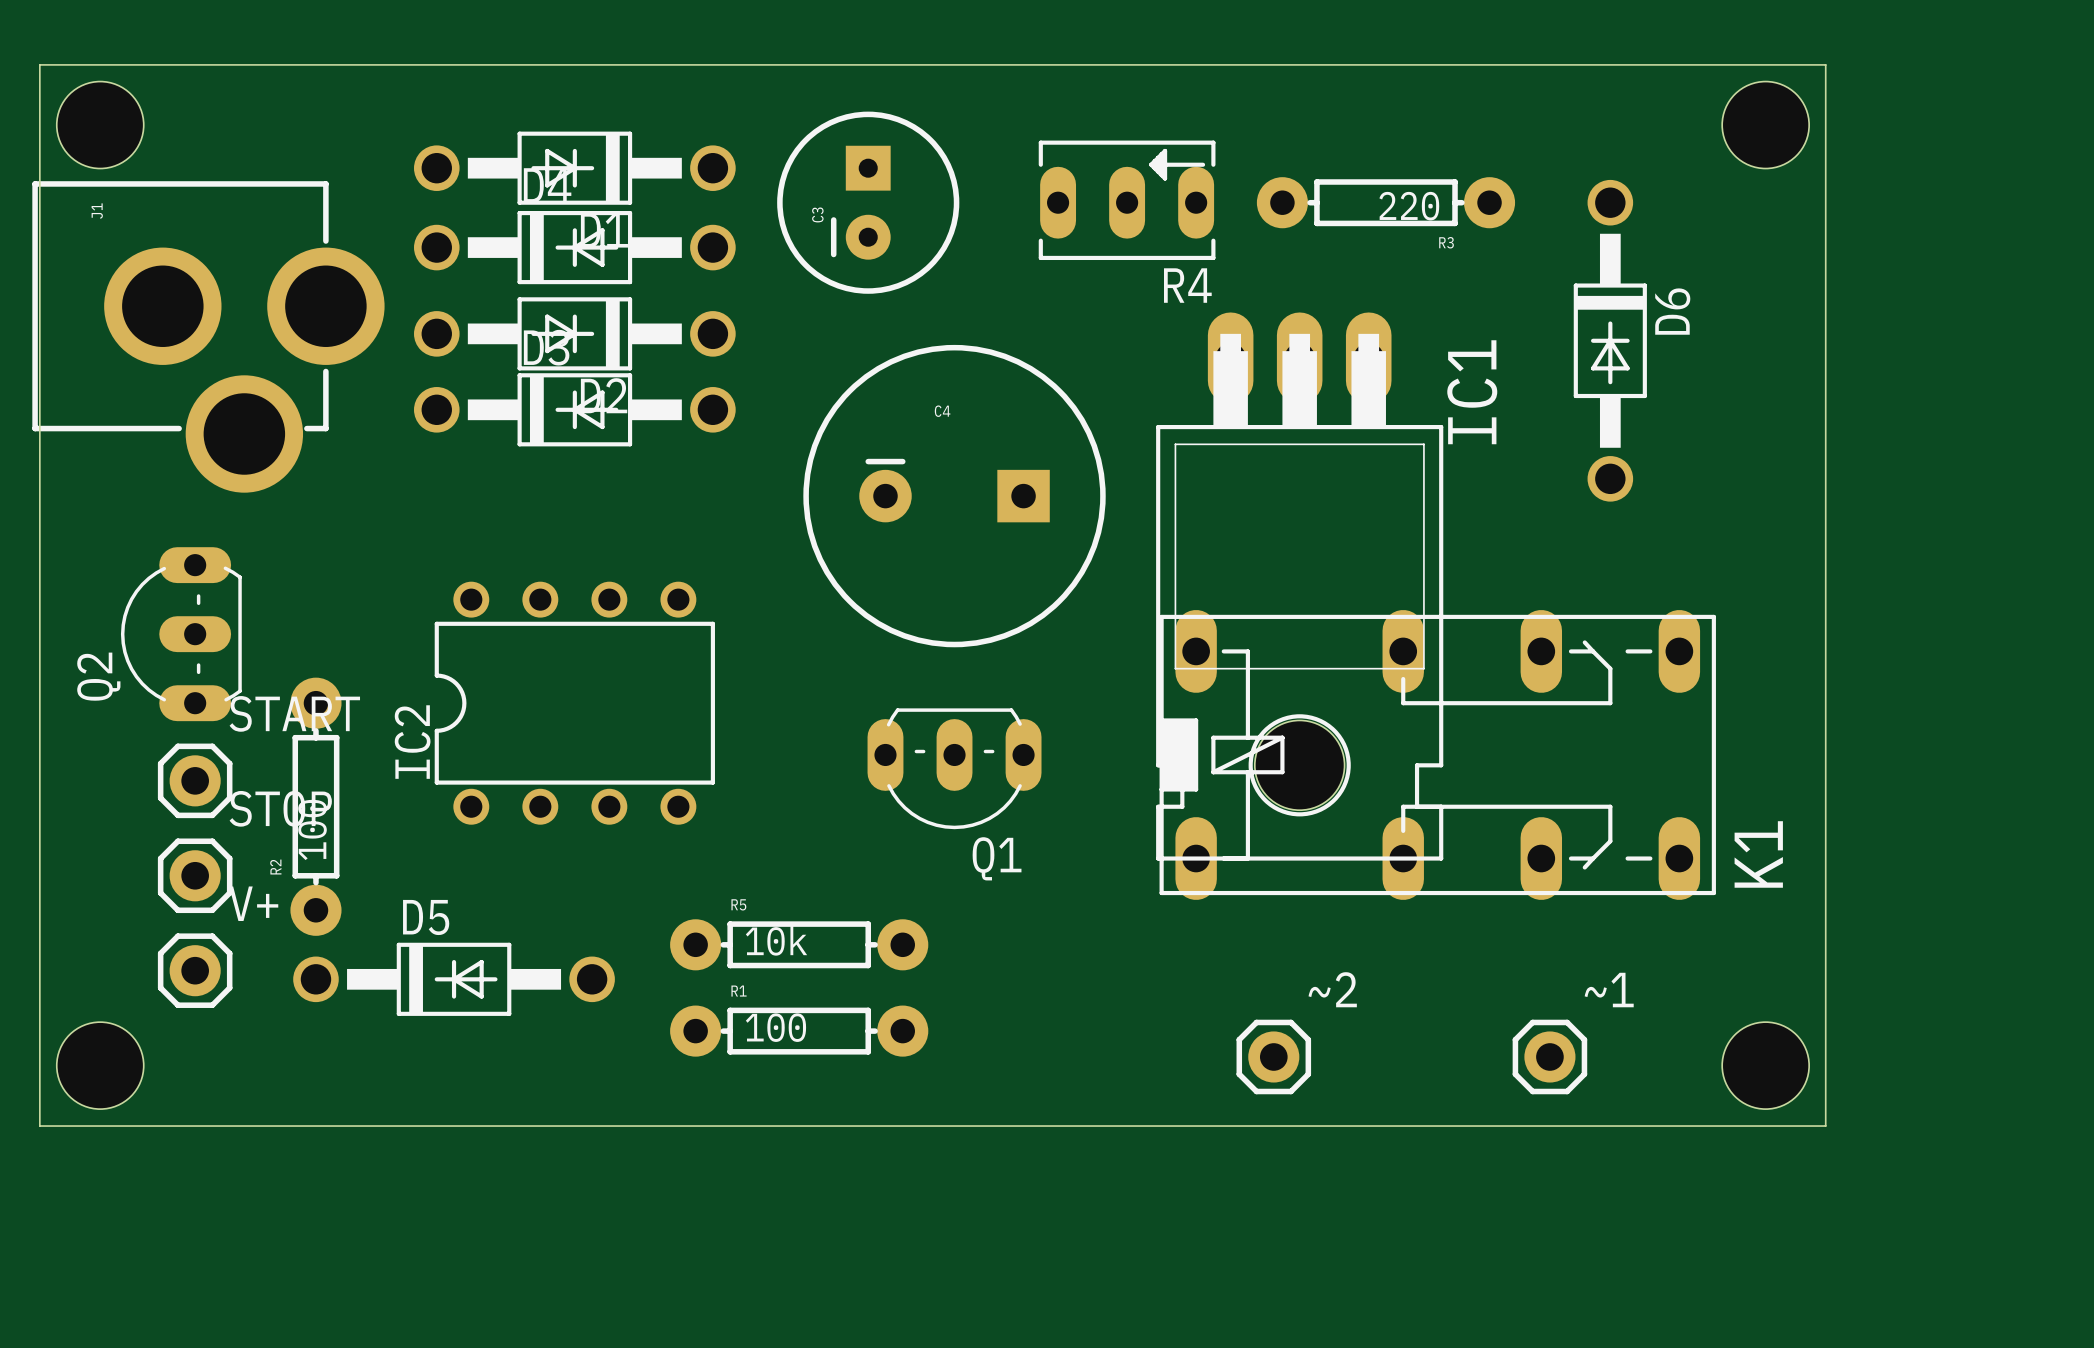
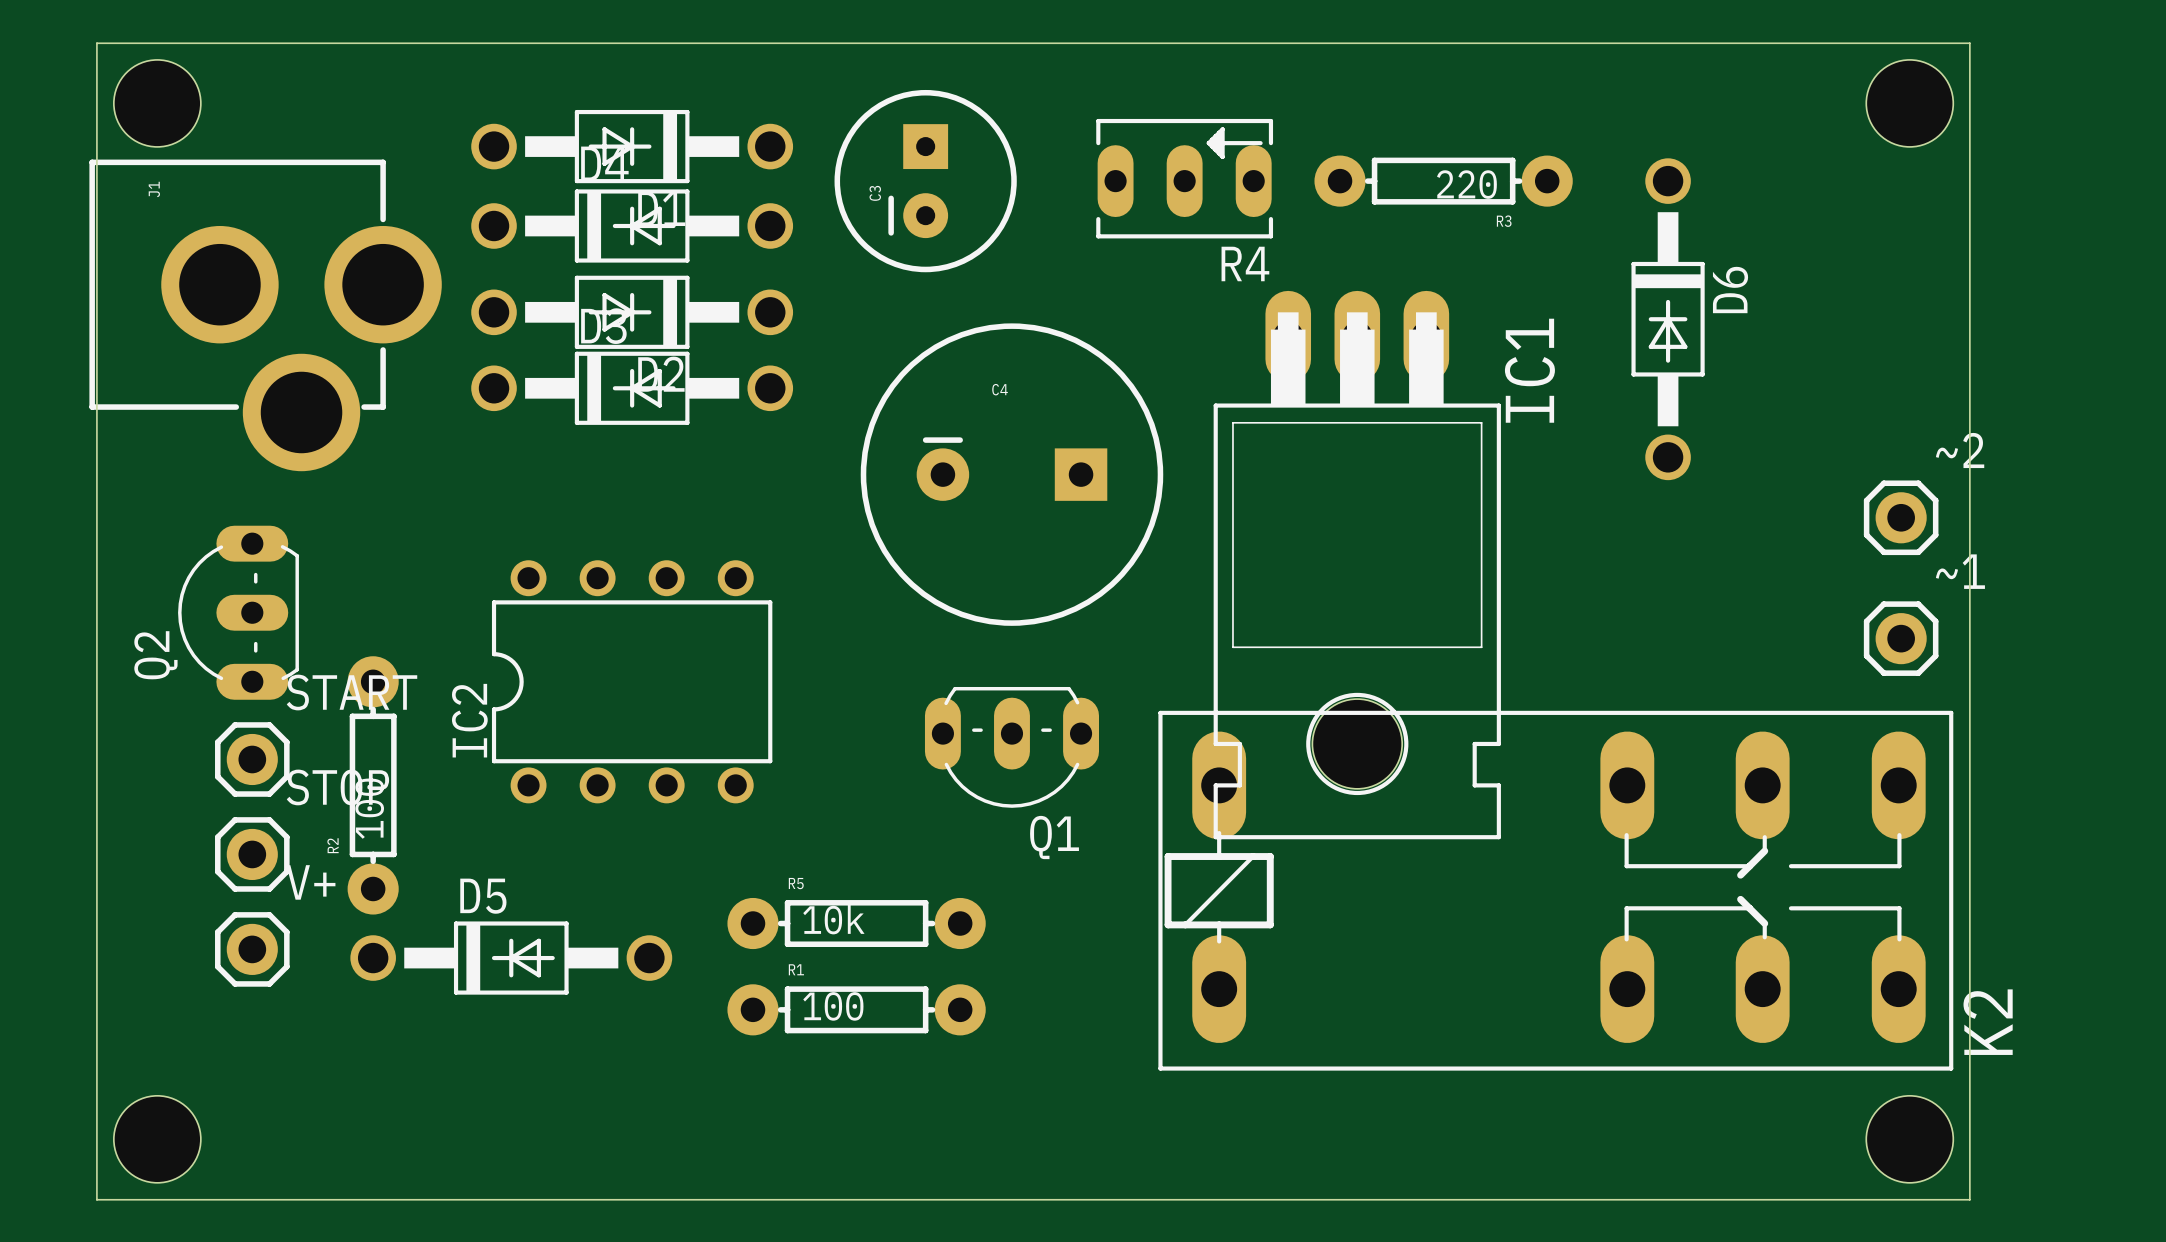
board edge: (1825, 64) (1825, 1126) (39, 1126) -> (1883, 43) (1969, 43) (1969, 1199) (96, 1199) (96, 1104)
hole position: (1765, 125) -> (1909, 103)
K1: (1437, 754) -> none
K2: none -> (1555, 890)
~2 position: (1273, 1056) -> (1901, 517)
~1 position: (1549, 1056) -> (1901, 638)
hole position: (100, 1065) -> (157, 1139)
hole position: (1765, 1065) -> (1909, 1139)

